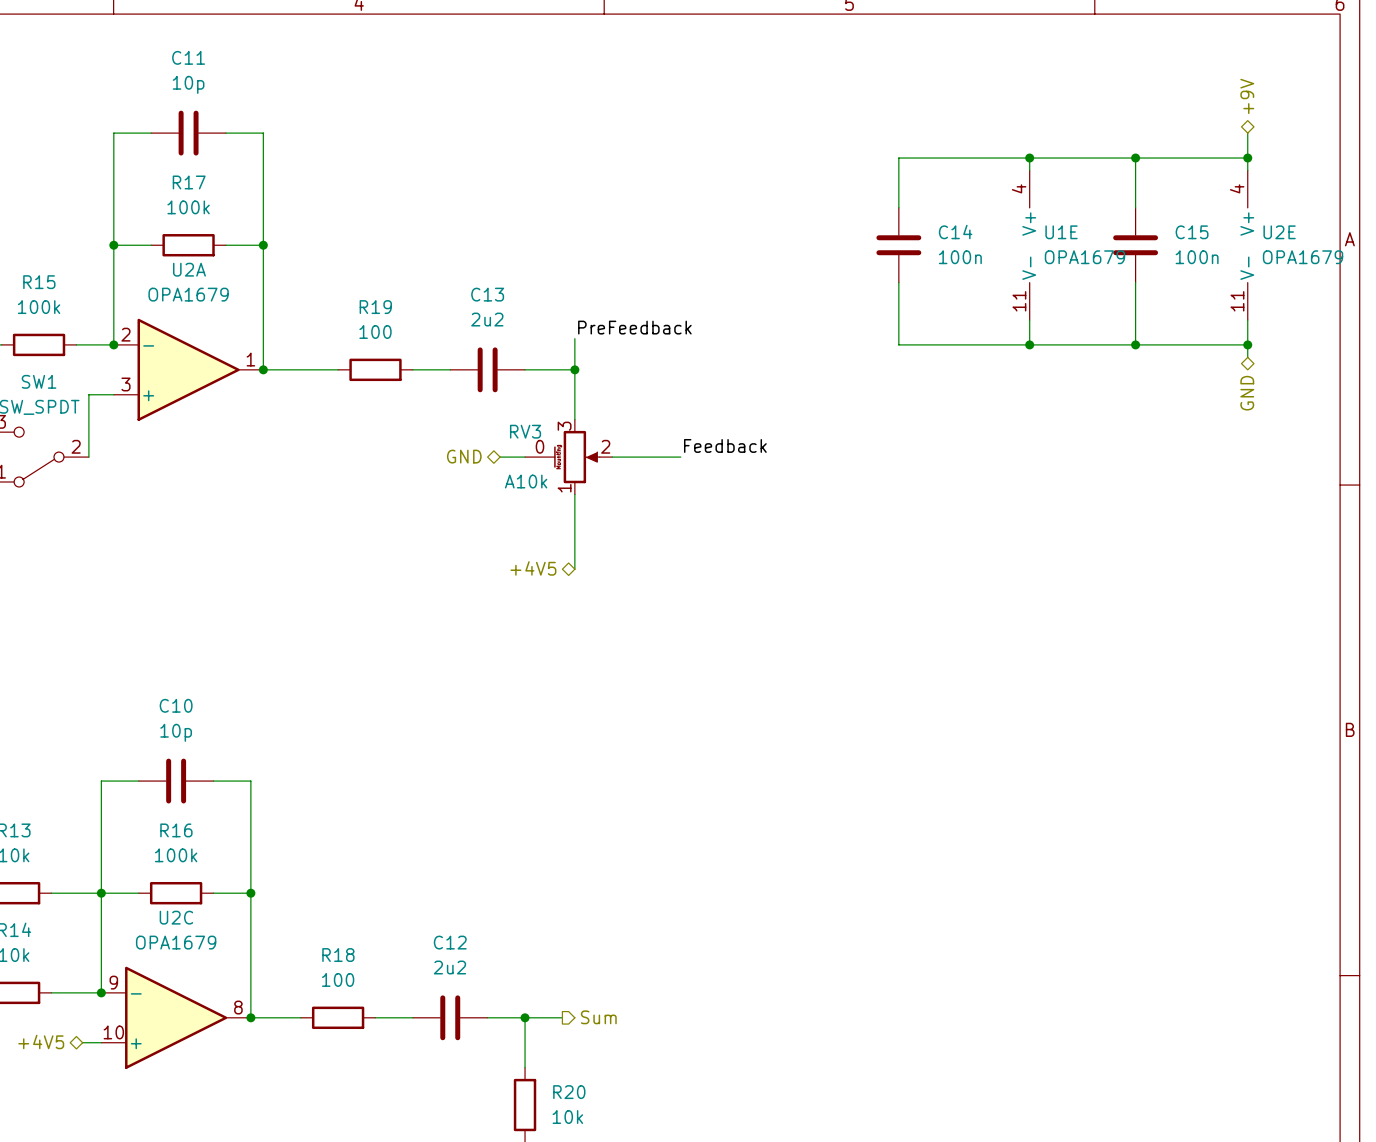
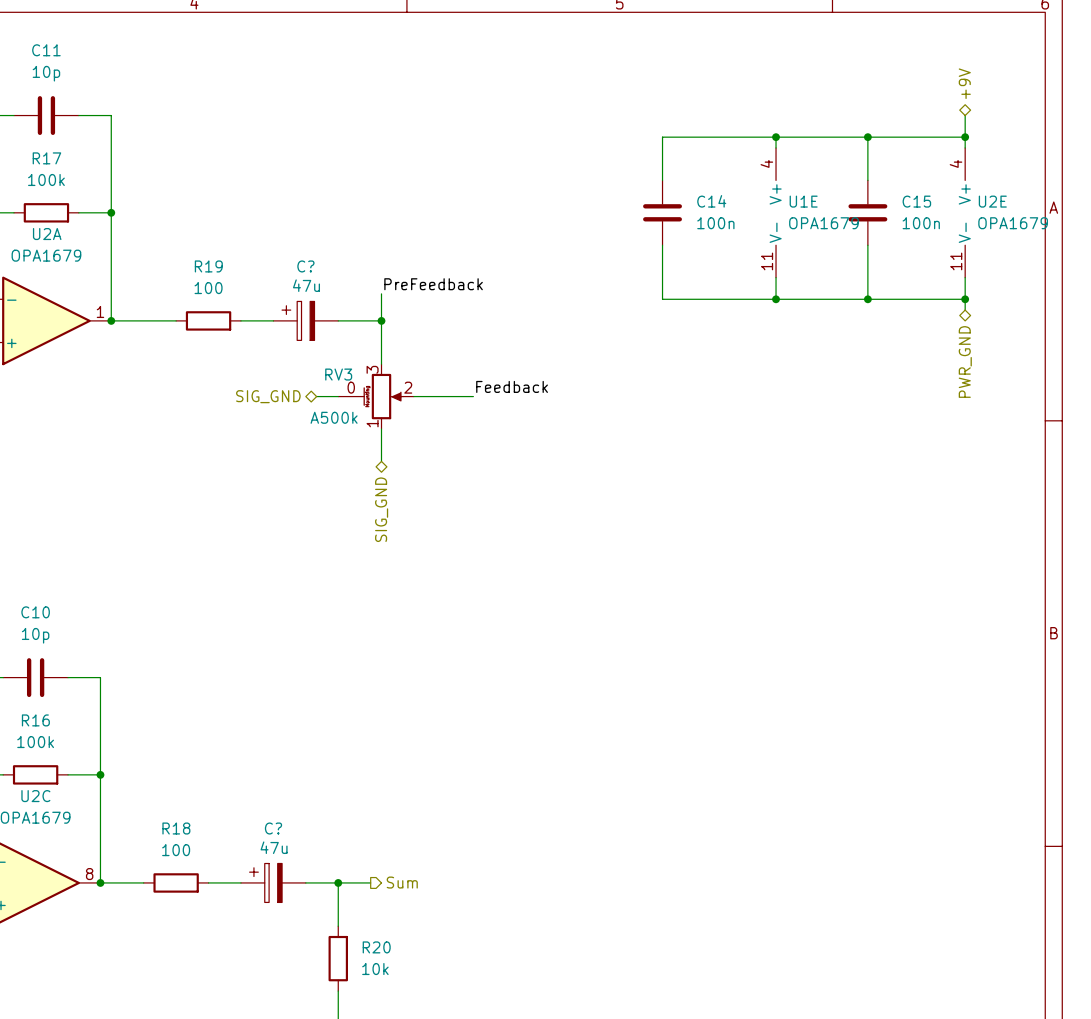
C13: 2u2 (487, 369) -> none
C?: none -> 47u (305, 320)
hierarchical label: GND (1247, 393) -> PWR_GND (965, 361)
hierarchical label: GND (464, 456) -> SIG_GND (268, 396)
RV3 value: A10k (526, 481) -> A500k (334, 417)
wire: (574, 531) (574, 569) -> none
hierarchical label: +4V5 (533, 568) -> none
hierarchical label: none -> SIG_GND (381, 509)
C12: 2u2 (450, 1017) -> none
C?: none -> 47u (273, 882)

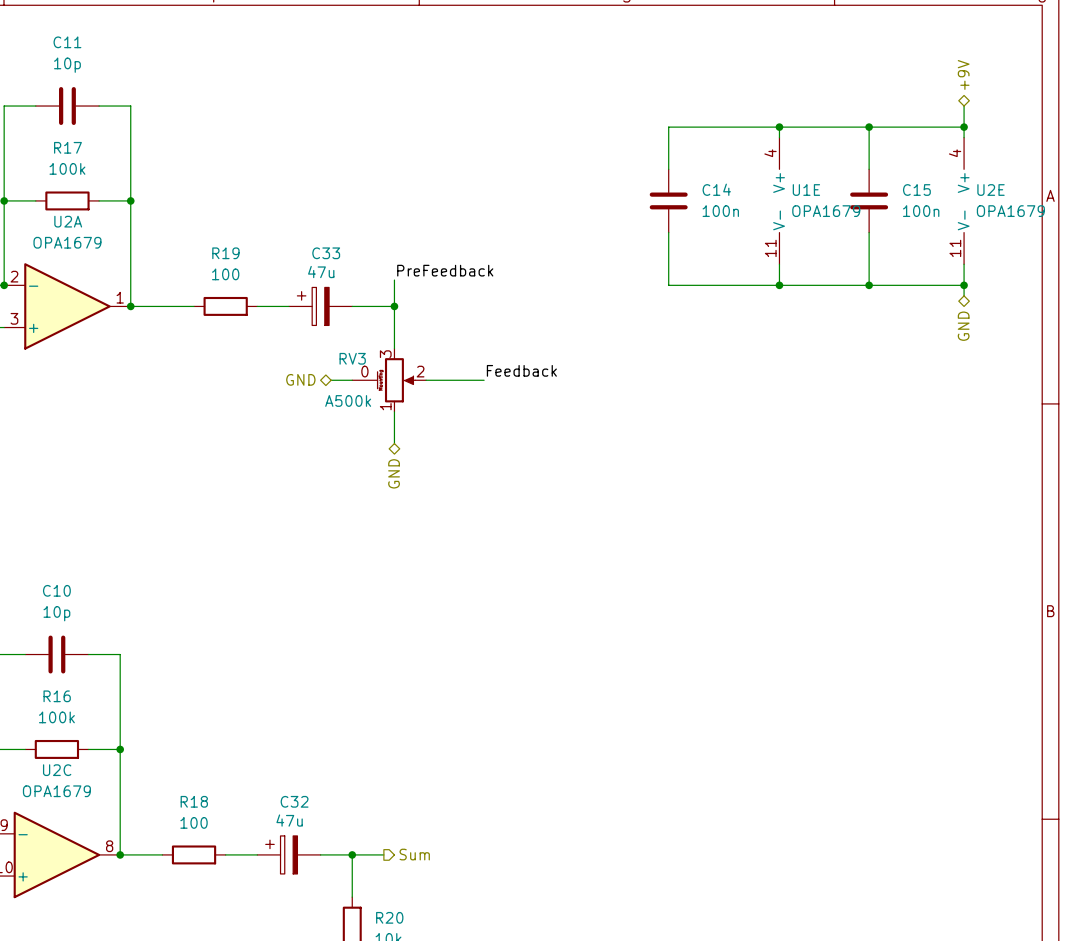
C? name: C? (305, 266) -> C33 (326, 253)
hierarchical label: PWR_GND (965, 361) -> GND (963, 326)
hierarchical label: SIG_GND (268, 396) -> GND (300, 379)
hierarchical label: SIG_GND (381, 509) -> GND (394, 473)
C? name: C? (273, 828) -> C32 (294, 801)

